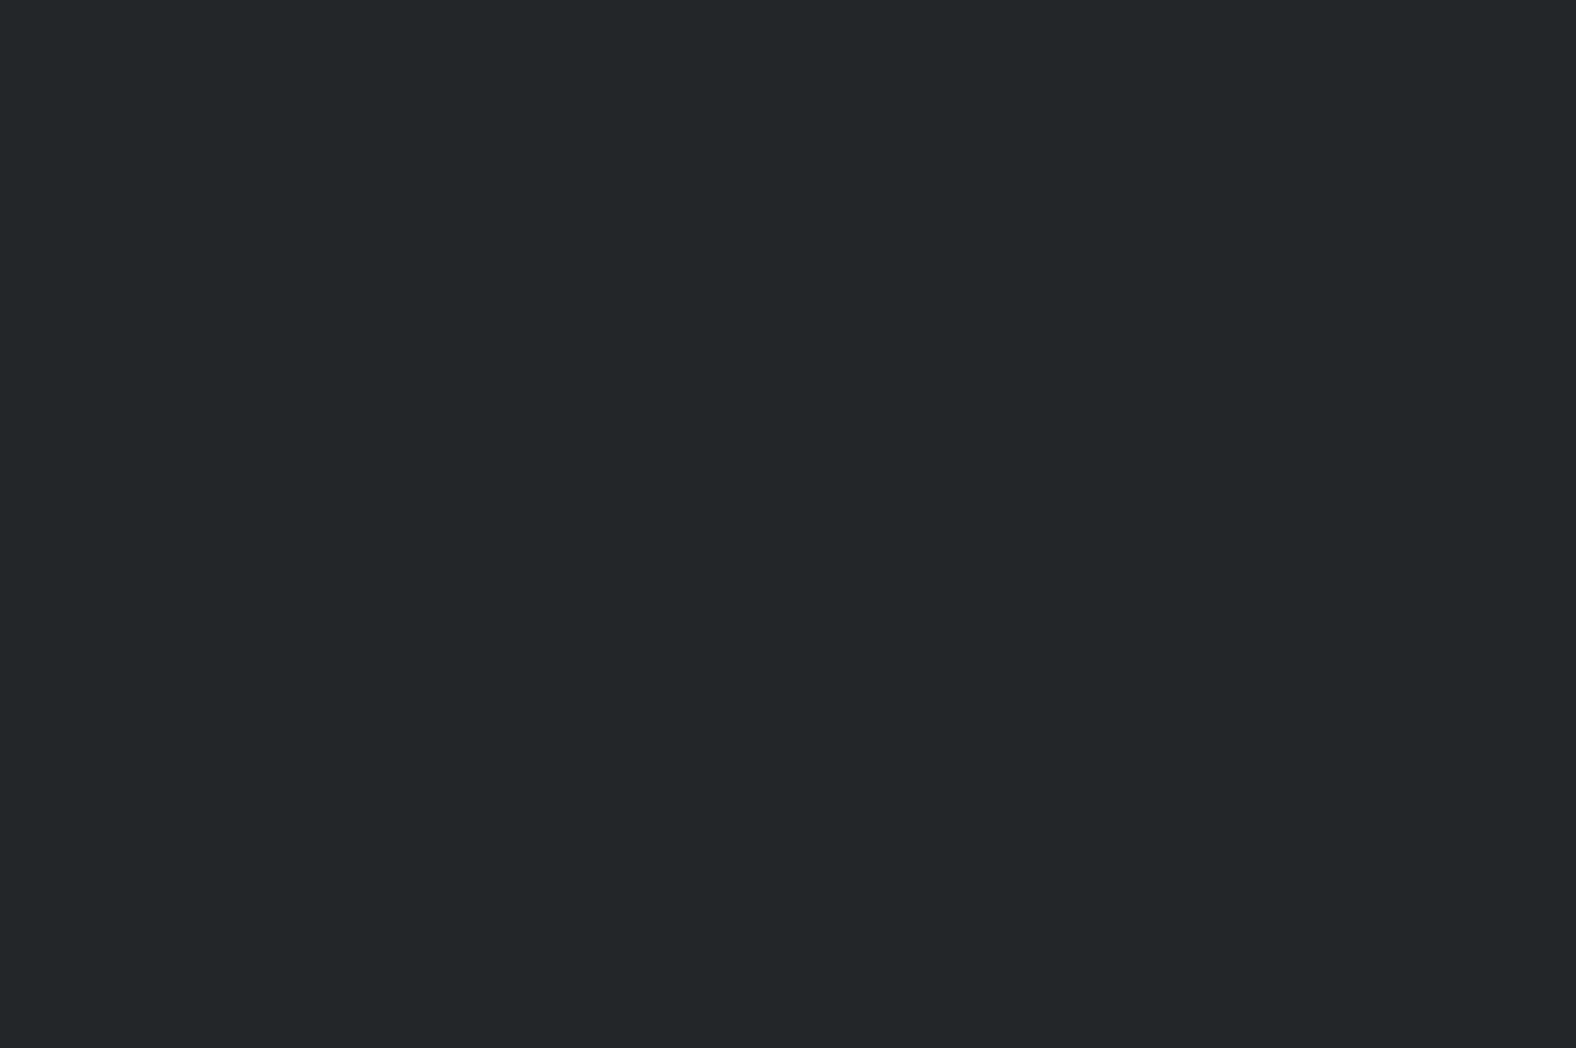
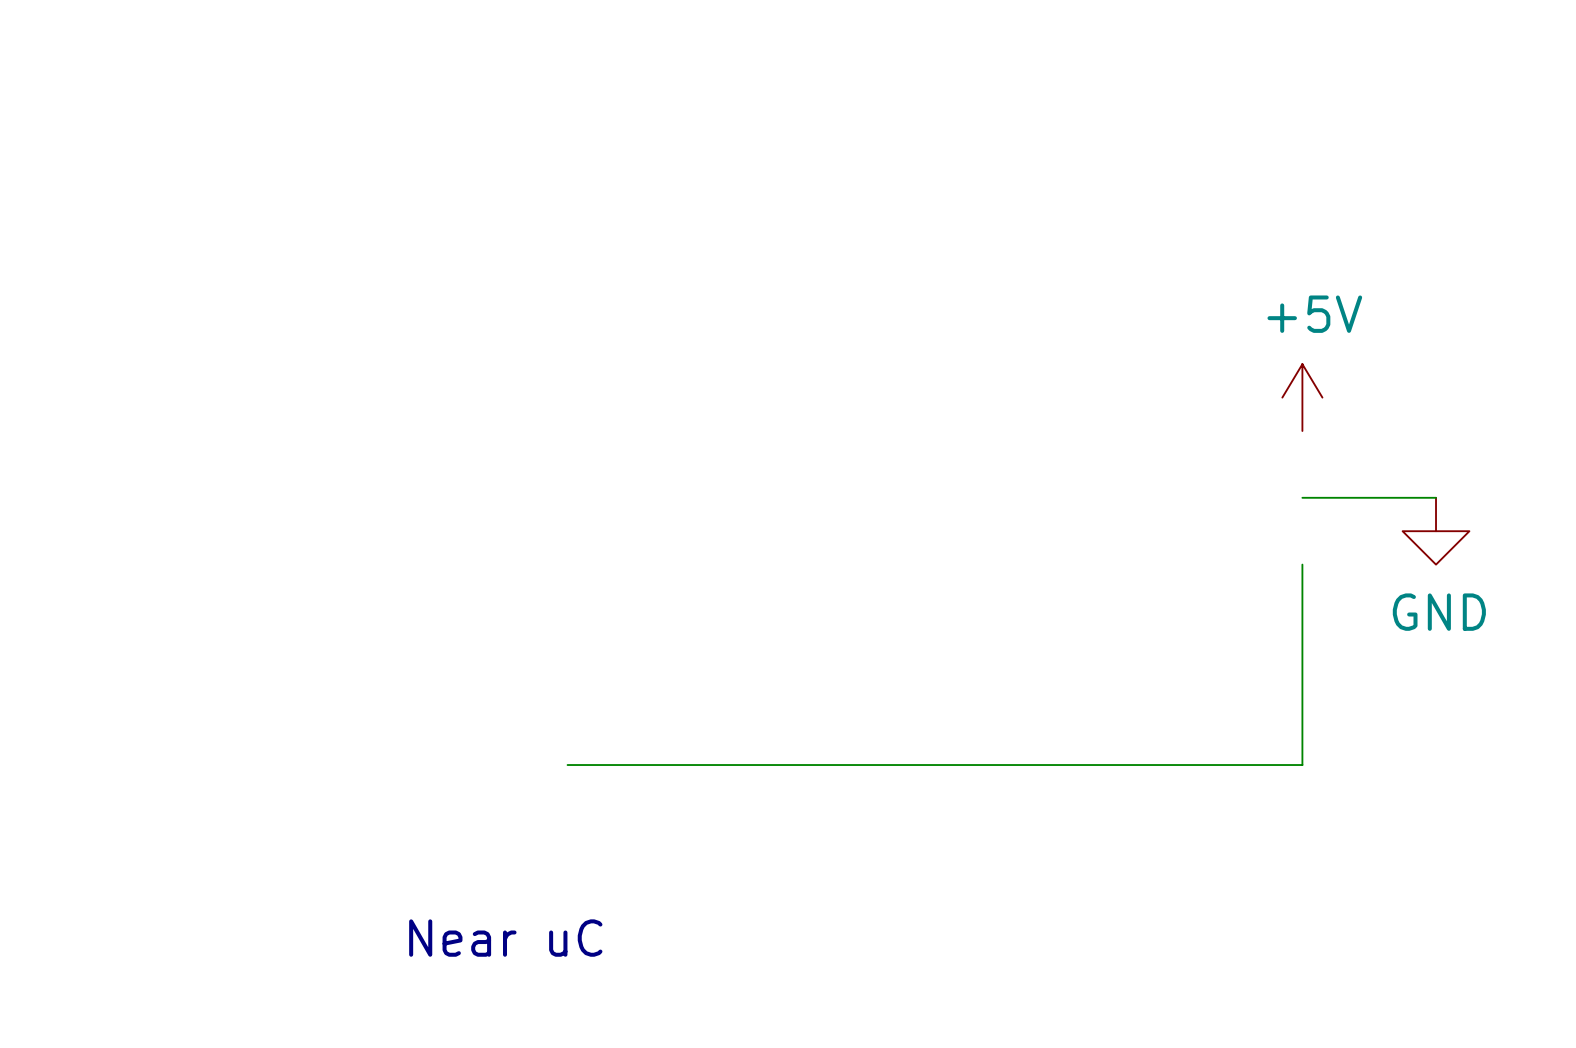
power symbol: none -> +5V (1302, 397)
wire: none -> (1302, 497) (1436, 497)
power symbol: none -> GND (1436, 531)
wire: none -> (1302, 564) (1302, 765) (567, 765)
text: none -> Near uC (505, 938)

